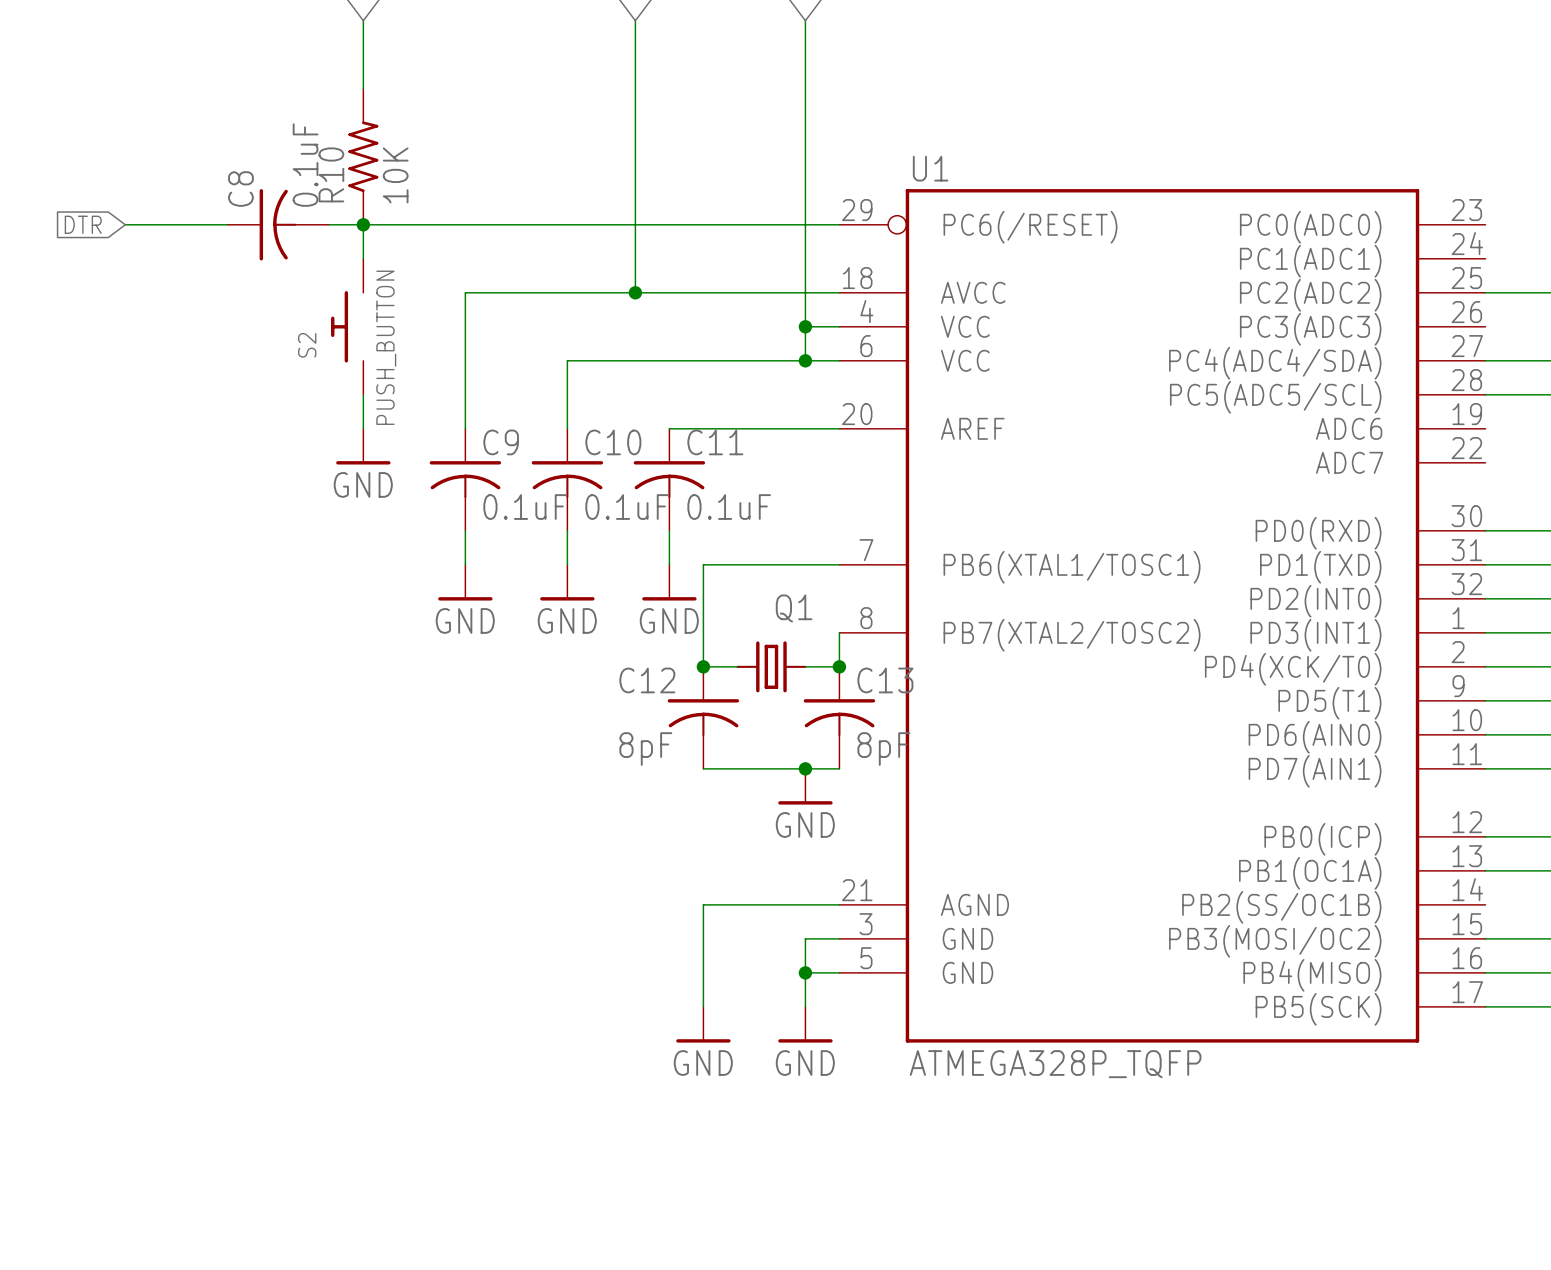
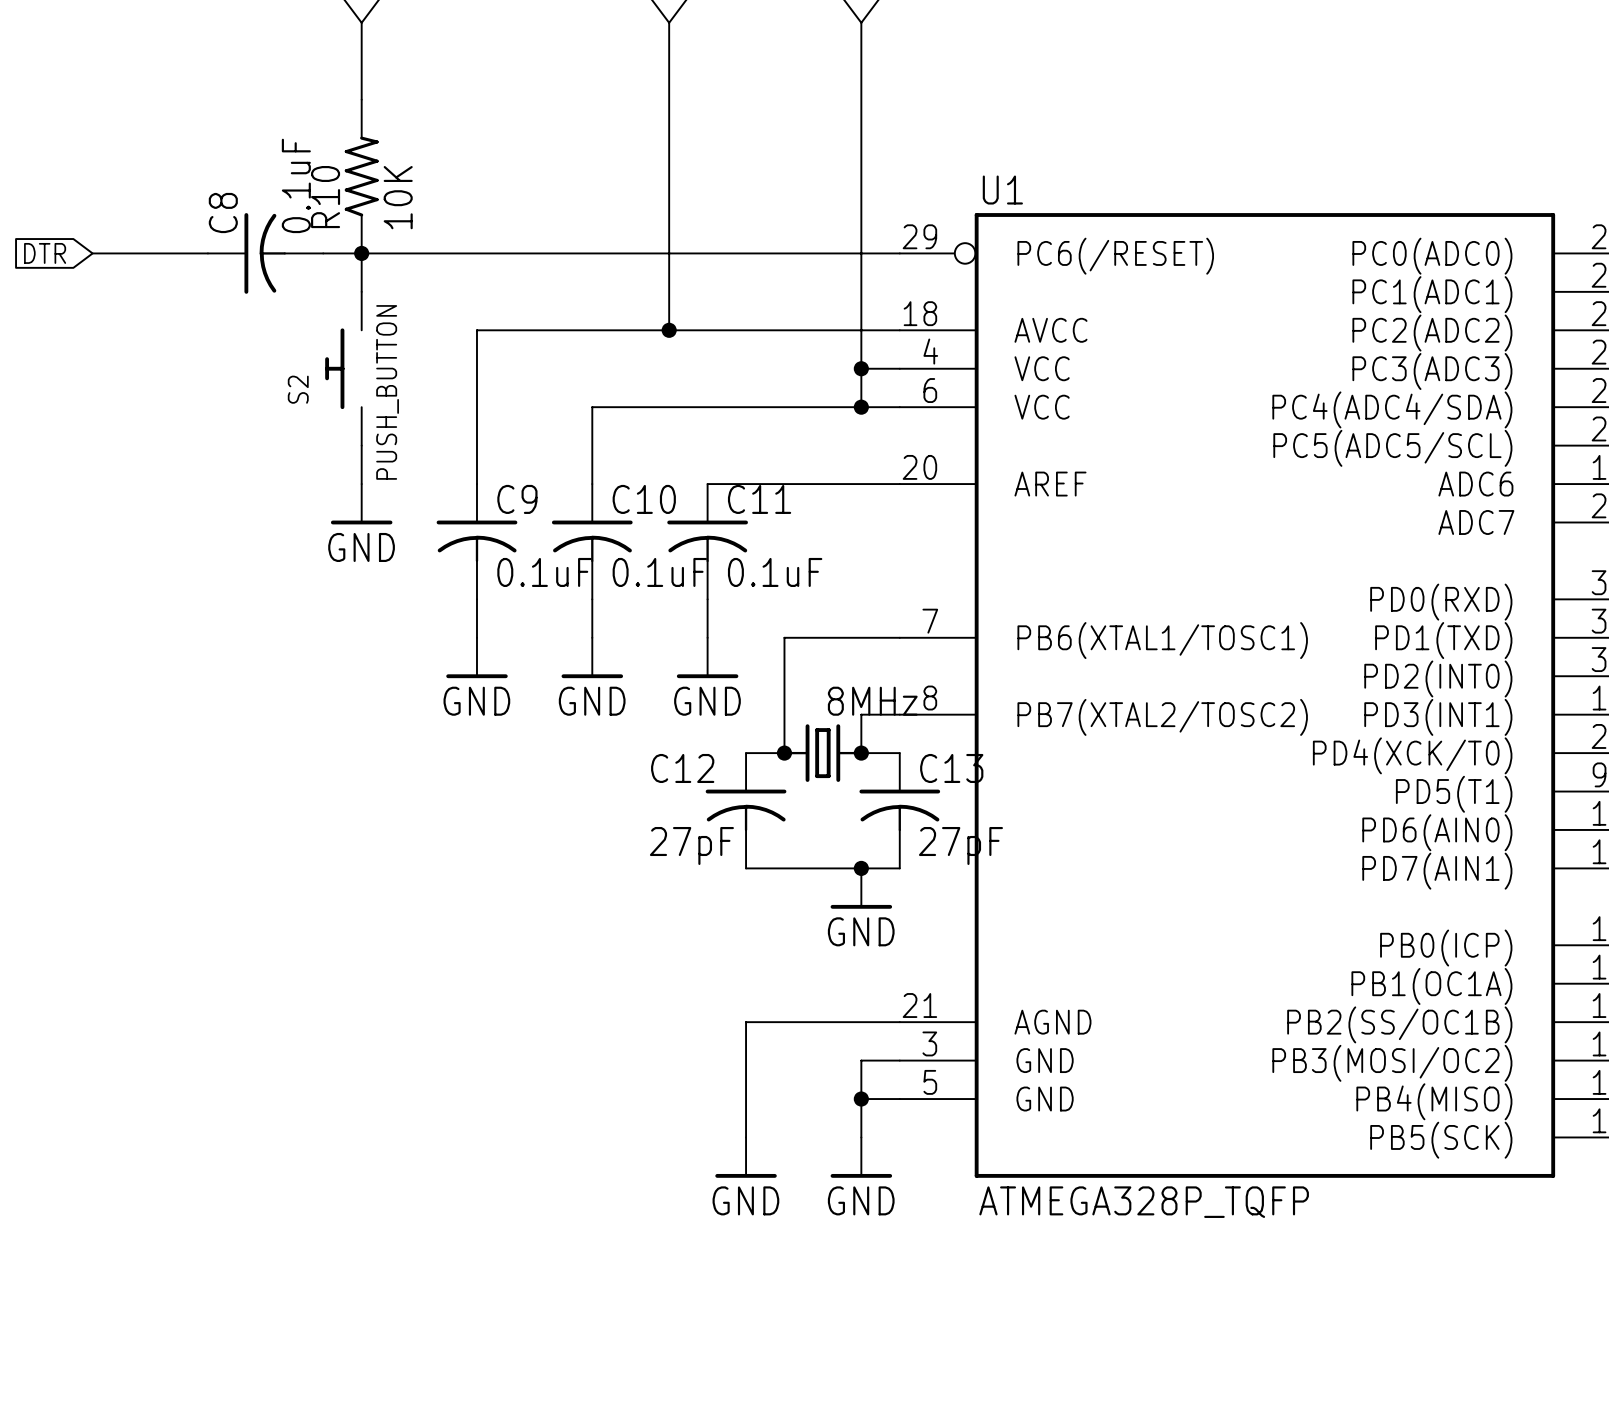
wire: (737, 564) (703, 564) (703, 666) -> (784, 637) (784, 753)
Q1 name: Q1 (794, 608) -> none
Q1 value: none -> 8MHz (872, 701)
wire: (839, 632) (839, 666) -> (899, 714) (861, 714) (861, 753)
junction position: (703, 666) -> (784, 753)
junction position: (839, 666) -> (861, 753)
C12 value: 8pF (645, 749) -> 27pF (691, 845)
C13 value: 8pF (883, 749) -> 27pF (960, 845)

